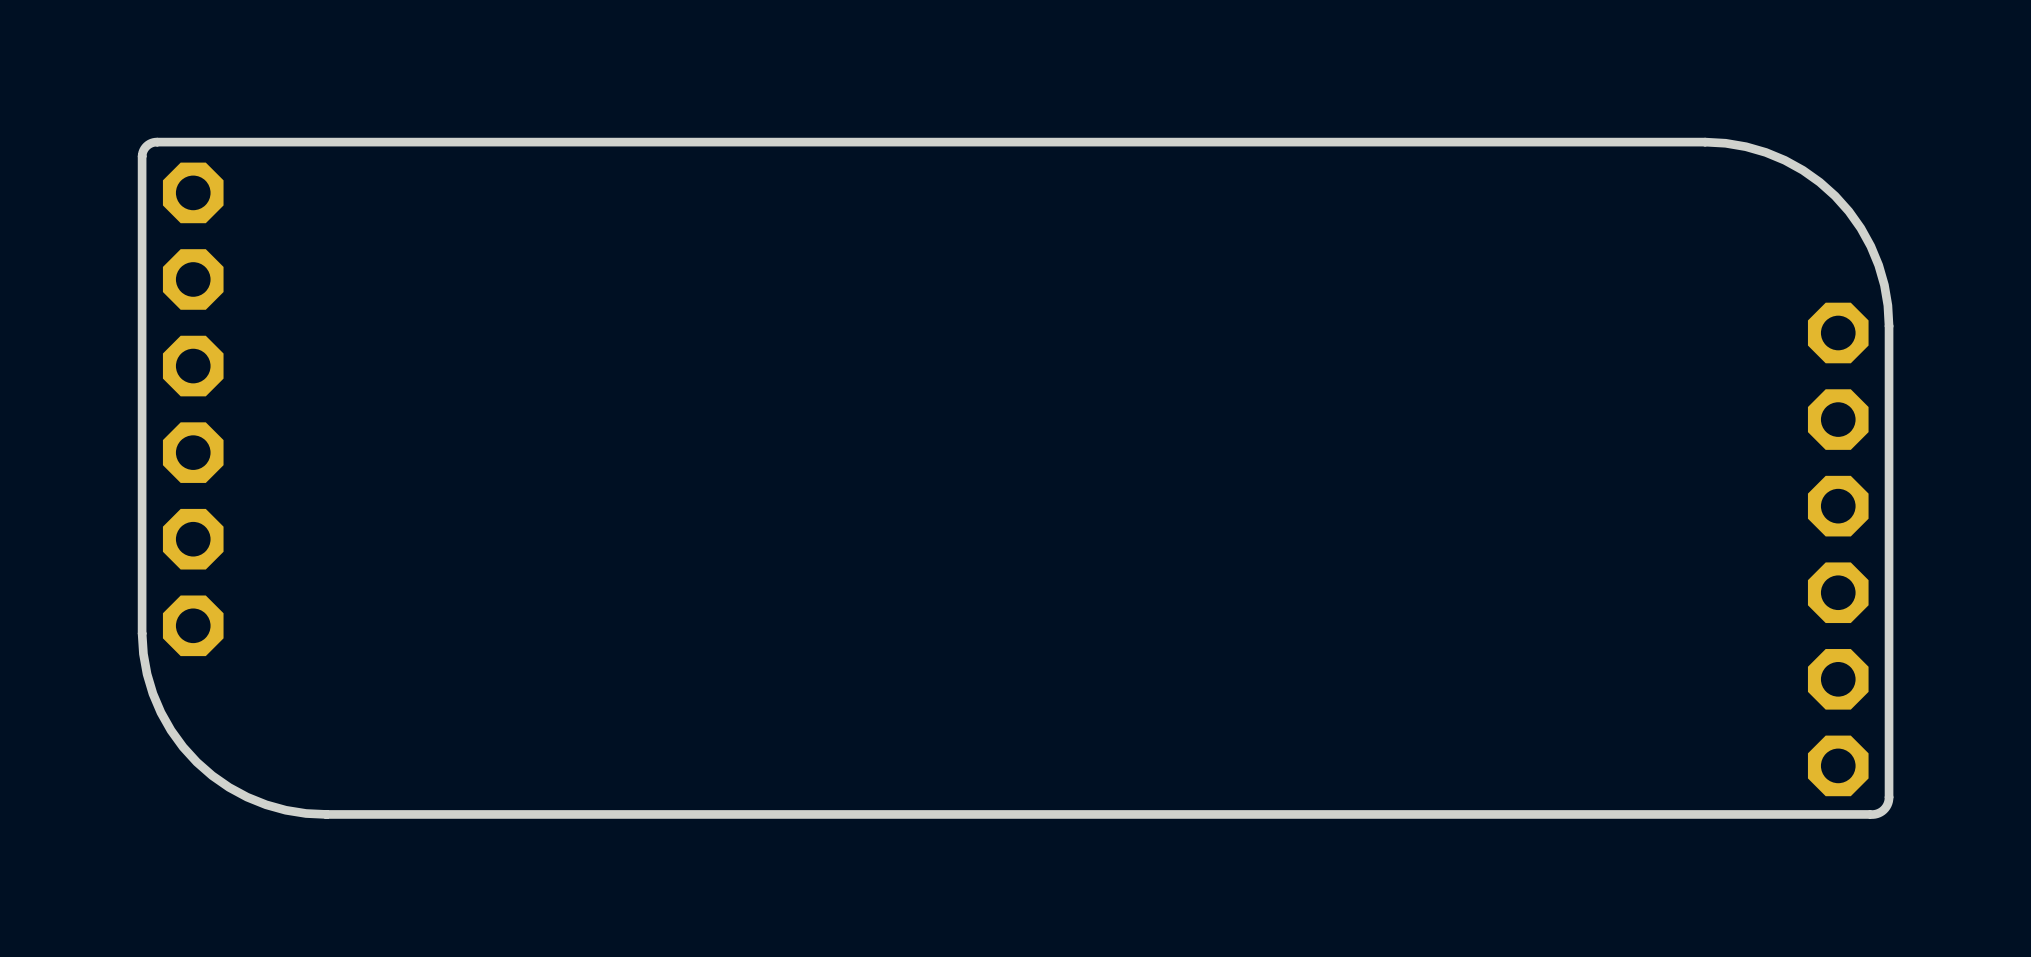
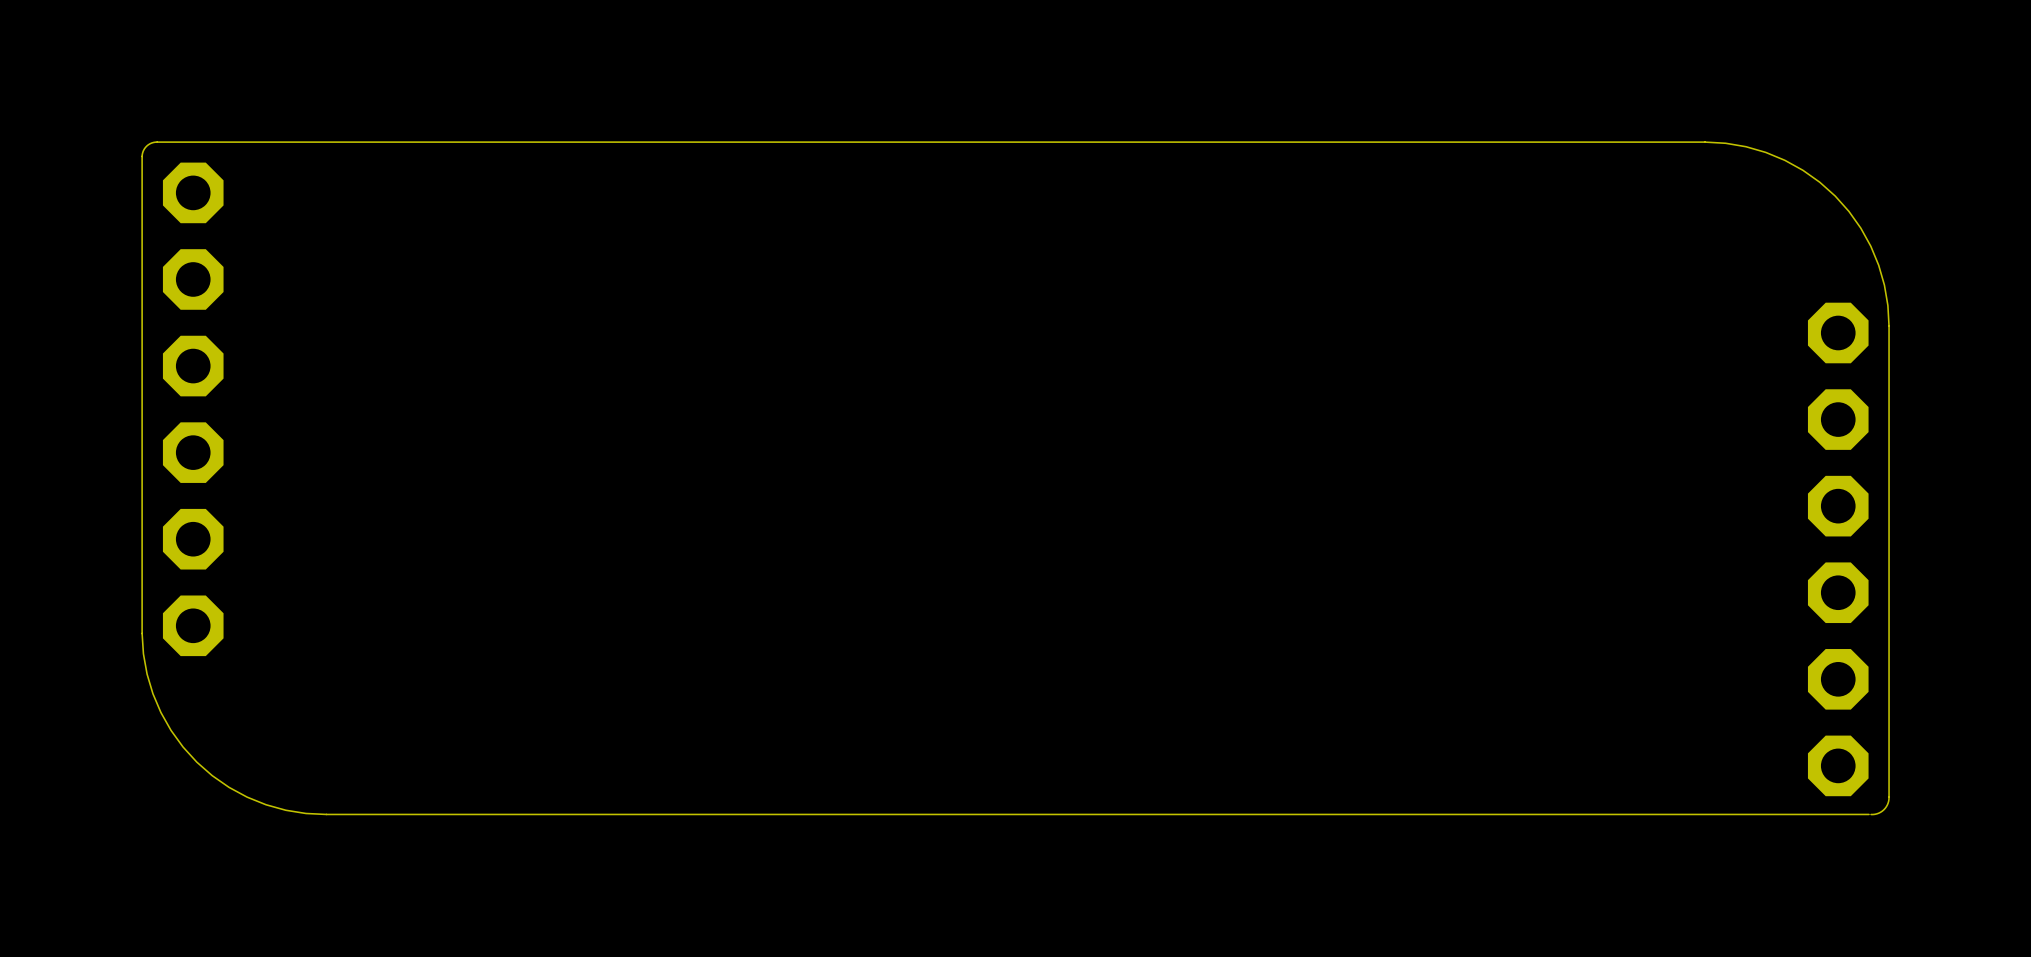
board edge width: thick (1869, 814) (326, 814) (306, 813) (266, 804) (229, 787) (196, 762) (183, 747) (160, 712) (147, 674) (142, 633) (143, 150) (148, 144) (157, 142) (1705, 142) (1746, 146) (1765, 152) (1784, 160) (1819, 182) (1848, 211) (1870, 246) (1884, 285) (1887, 305) (1889, 797) (1883, 809) (1870, 814) -> thin (1869, 814) (326, 814) (306, 813) (266, 804) (229, 787) (196, 762) (183, 747) (160, 712) (147, 674) (142, 633) (143, 150) (148, 144) (157, 142) (1705, 142) (1746, 146) (1765, 152) (1784, 160) (1819, 182) (1848, 211) (1870, 246) (1884, 285) (1887, 305) (1889, 797) (1883, 809) (1870, 814)

